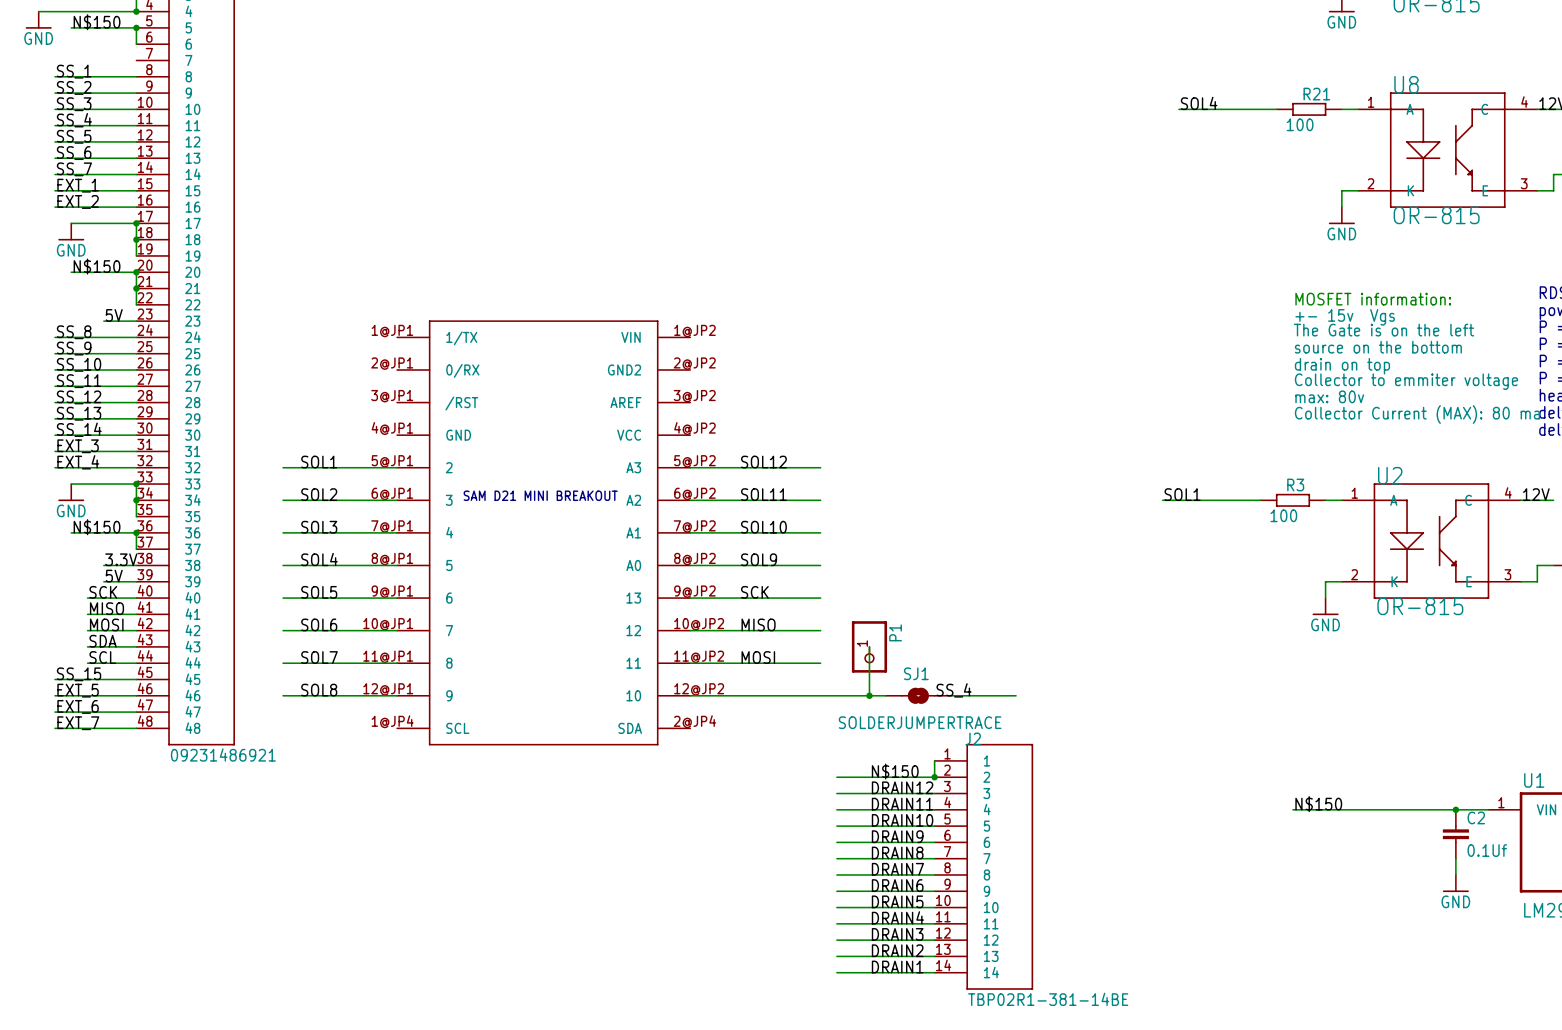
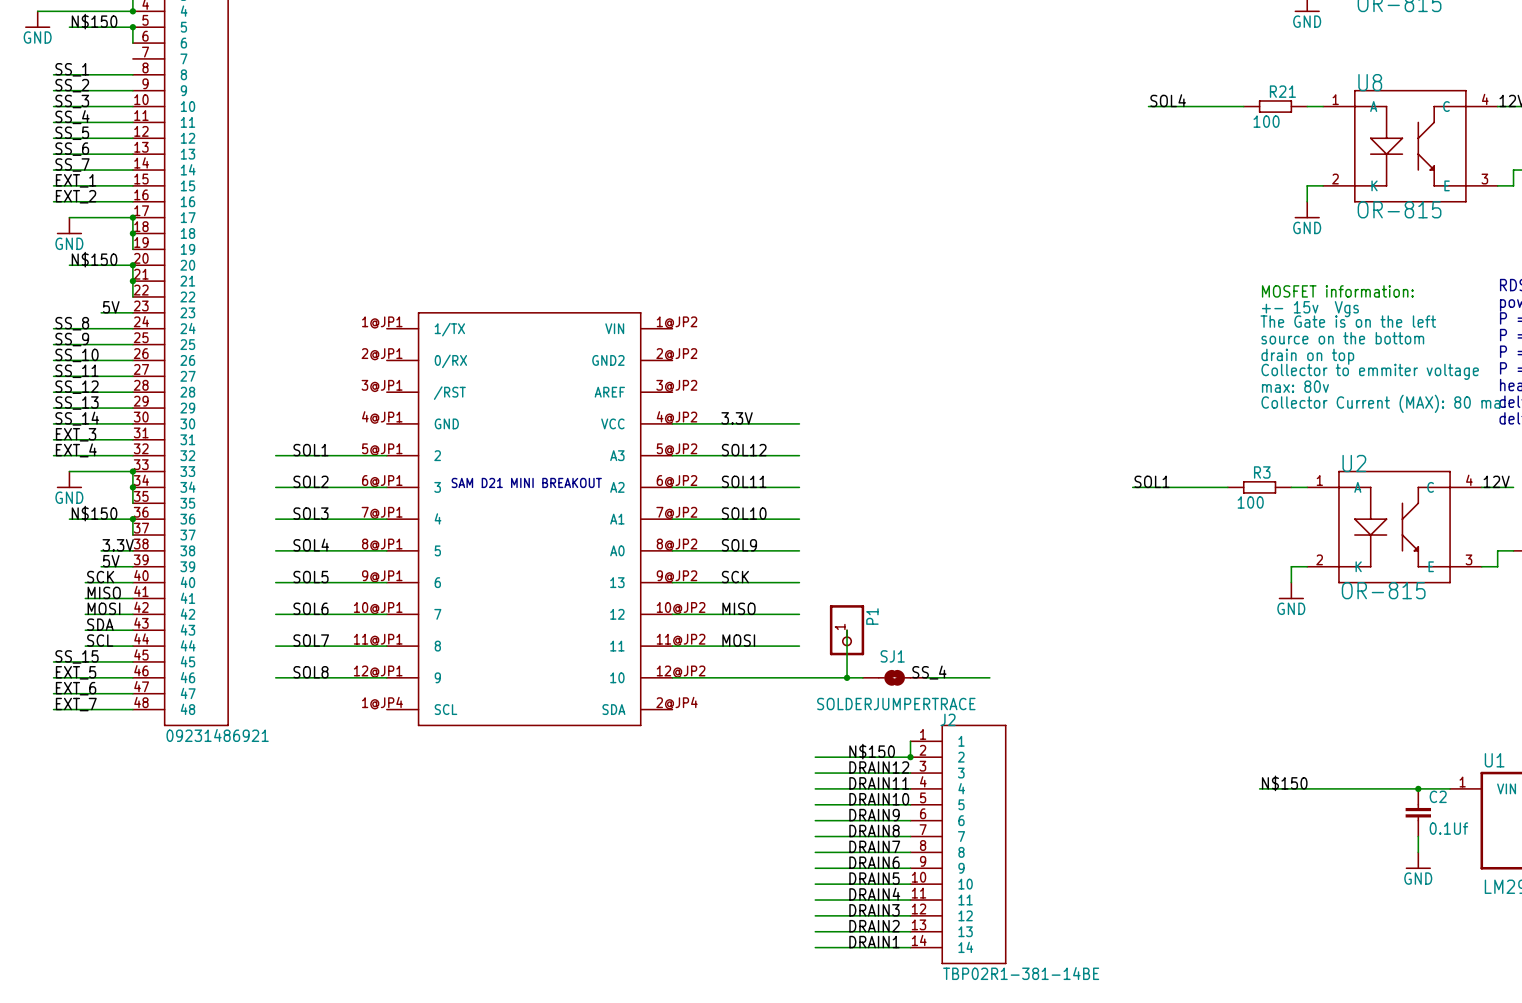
label: none -> 3.3V (737, 418)
wire: none -> (672, 423) (799, 423)

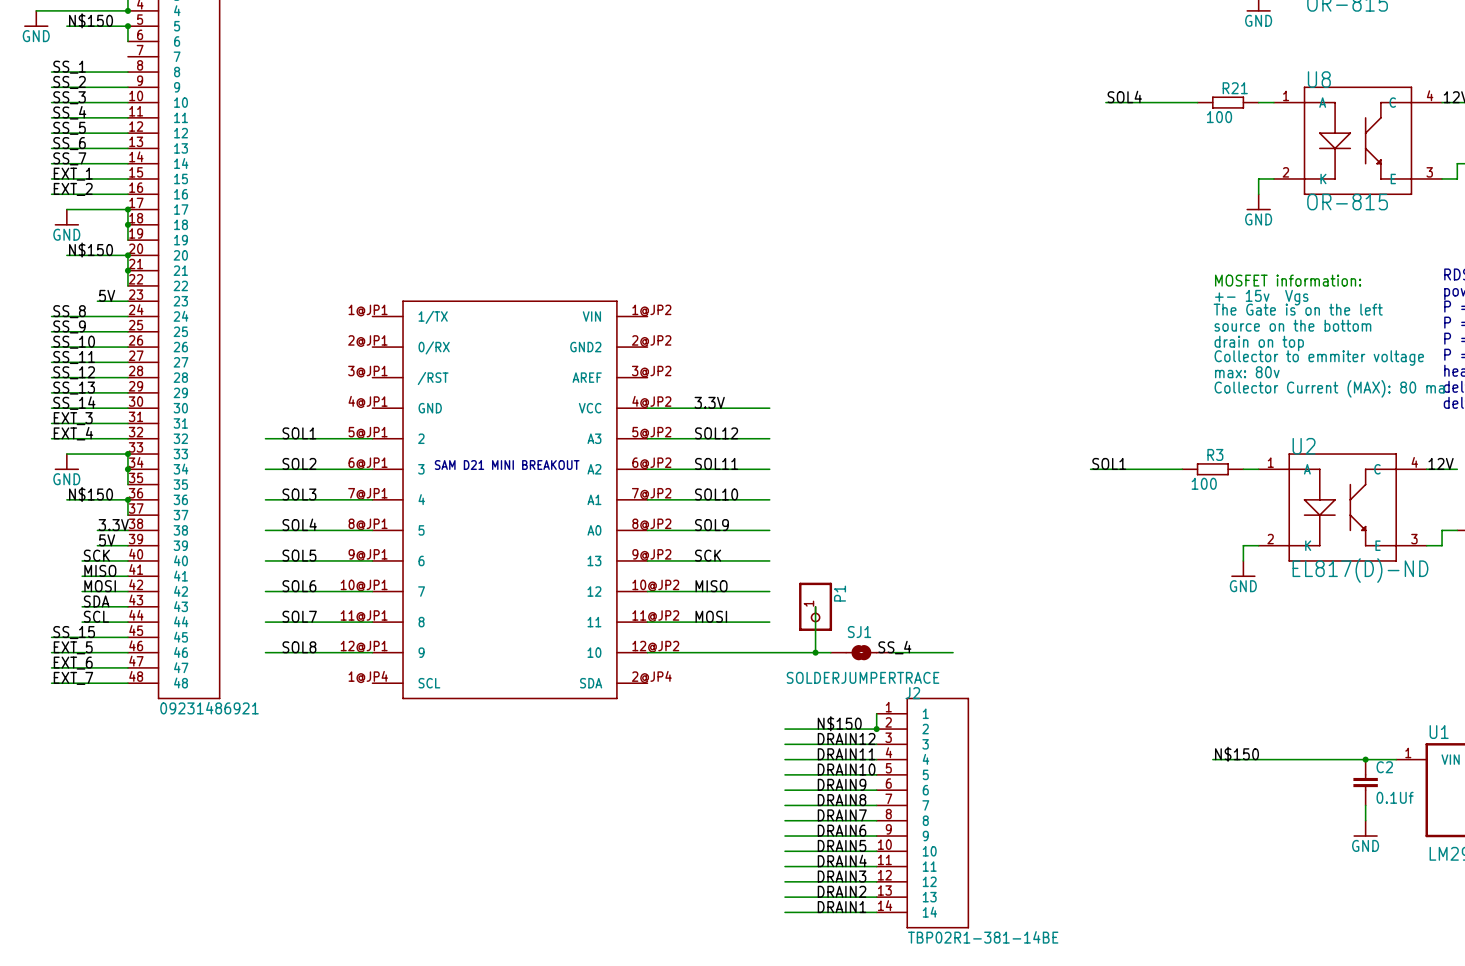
U2 value: OR-815 (1383, 590) -> EL817(D)-ND (1360, 570)

